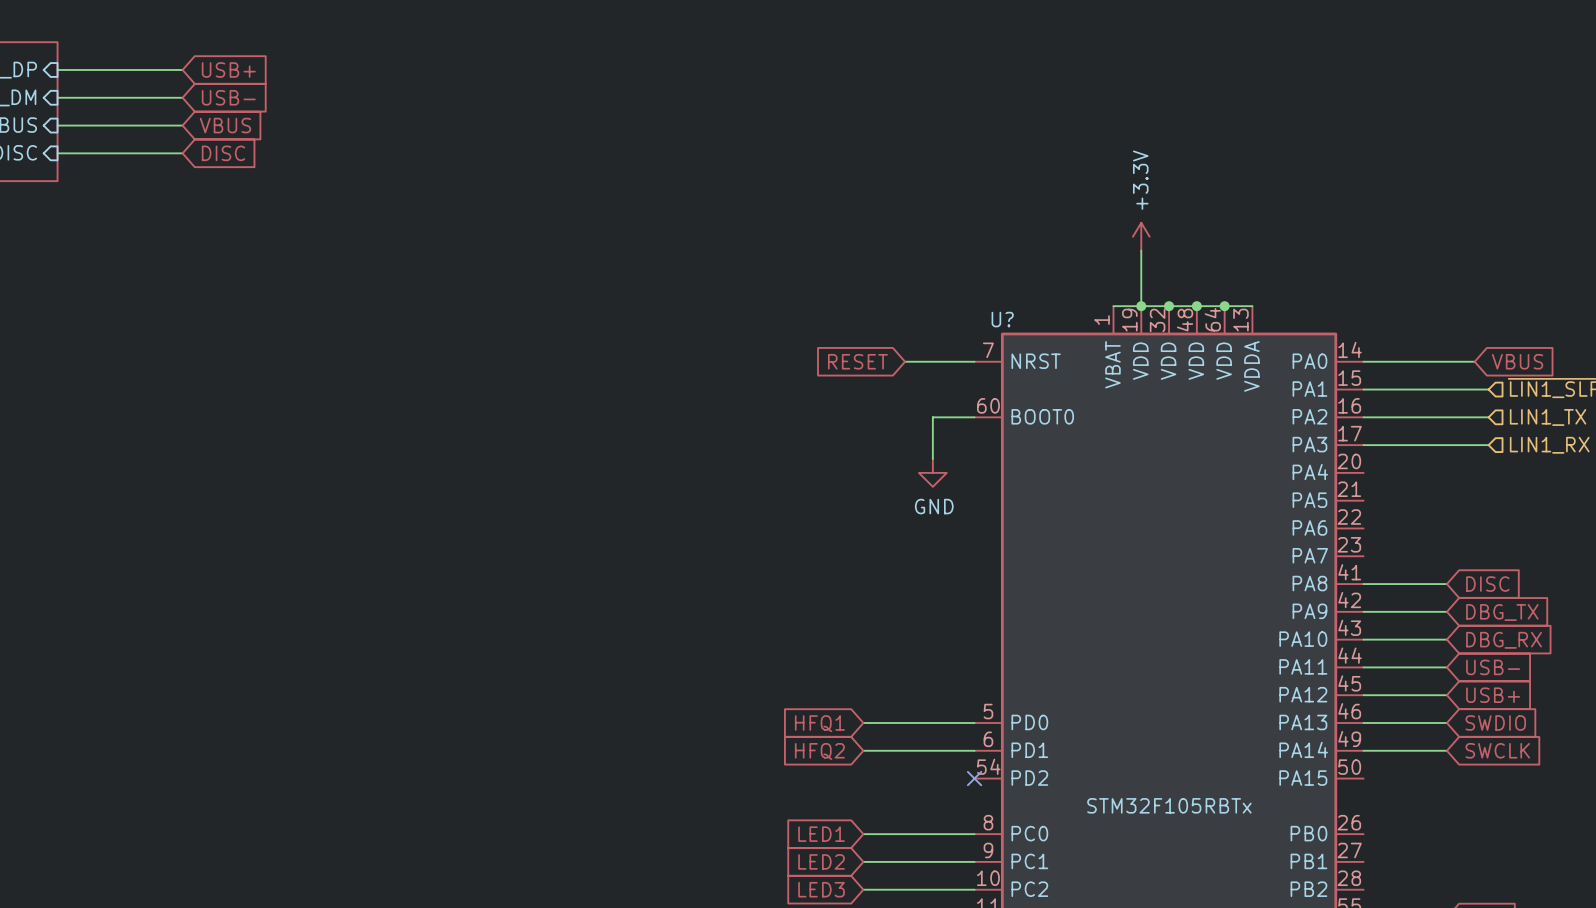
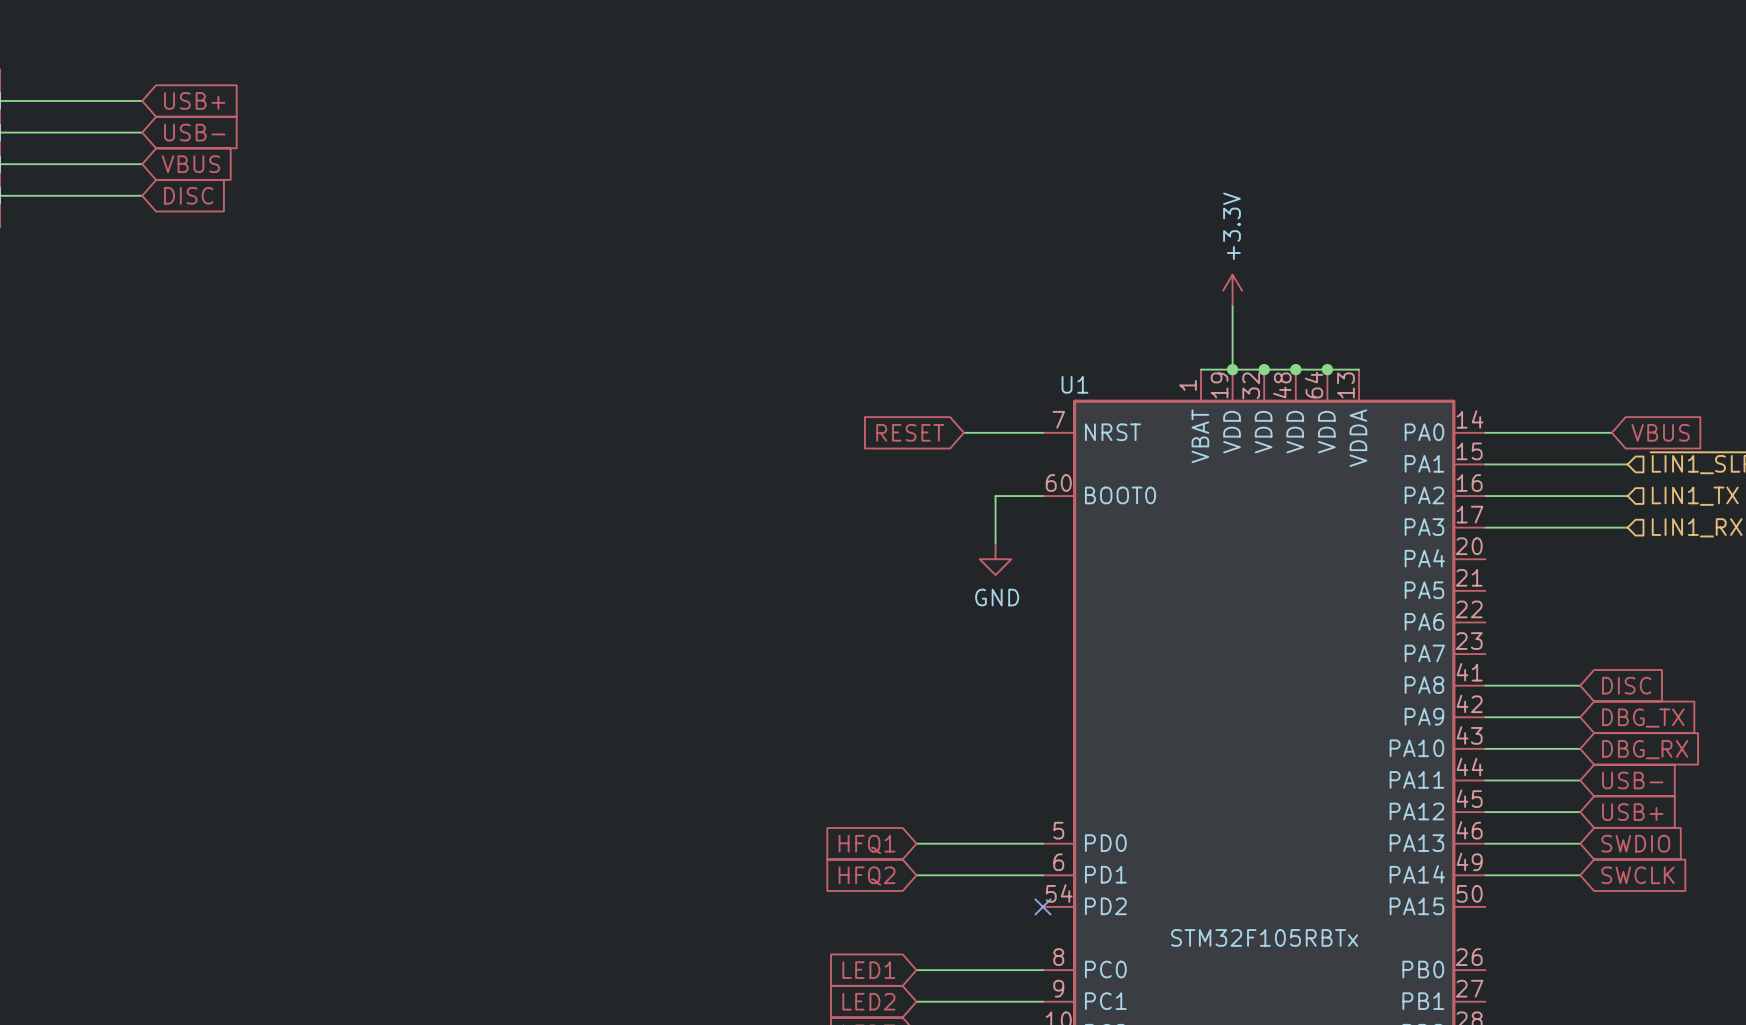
U? name: U? (1002, 319) -> U1 (1074, 384)

